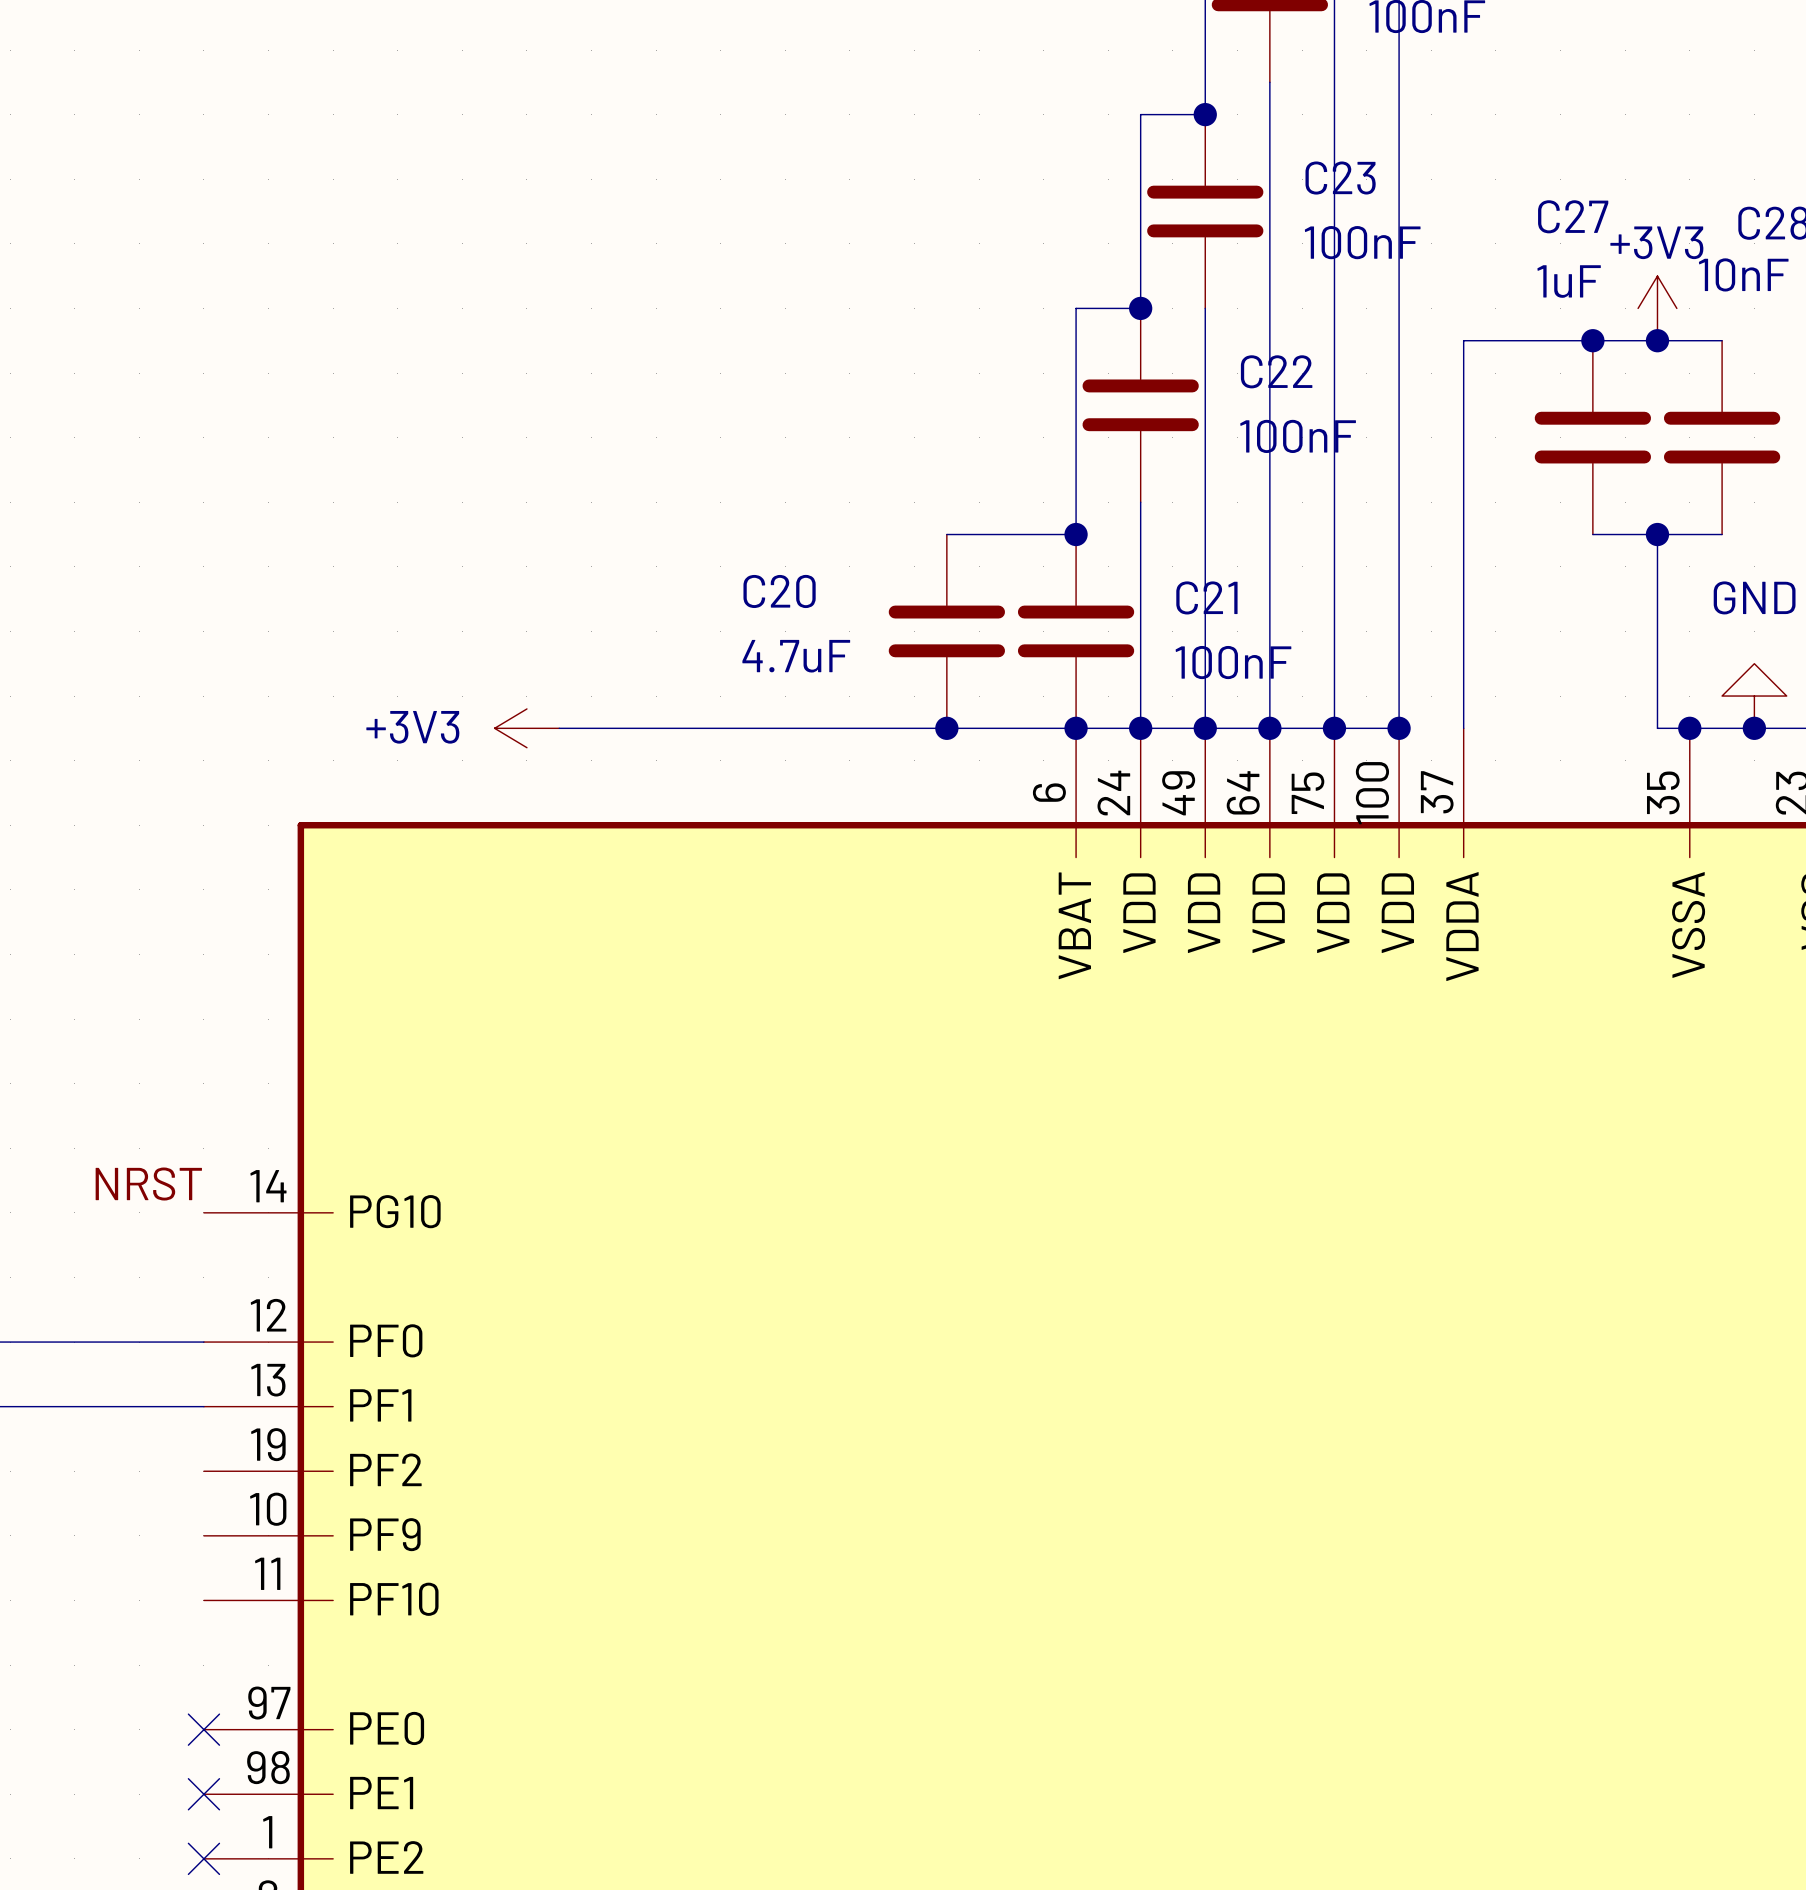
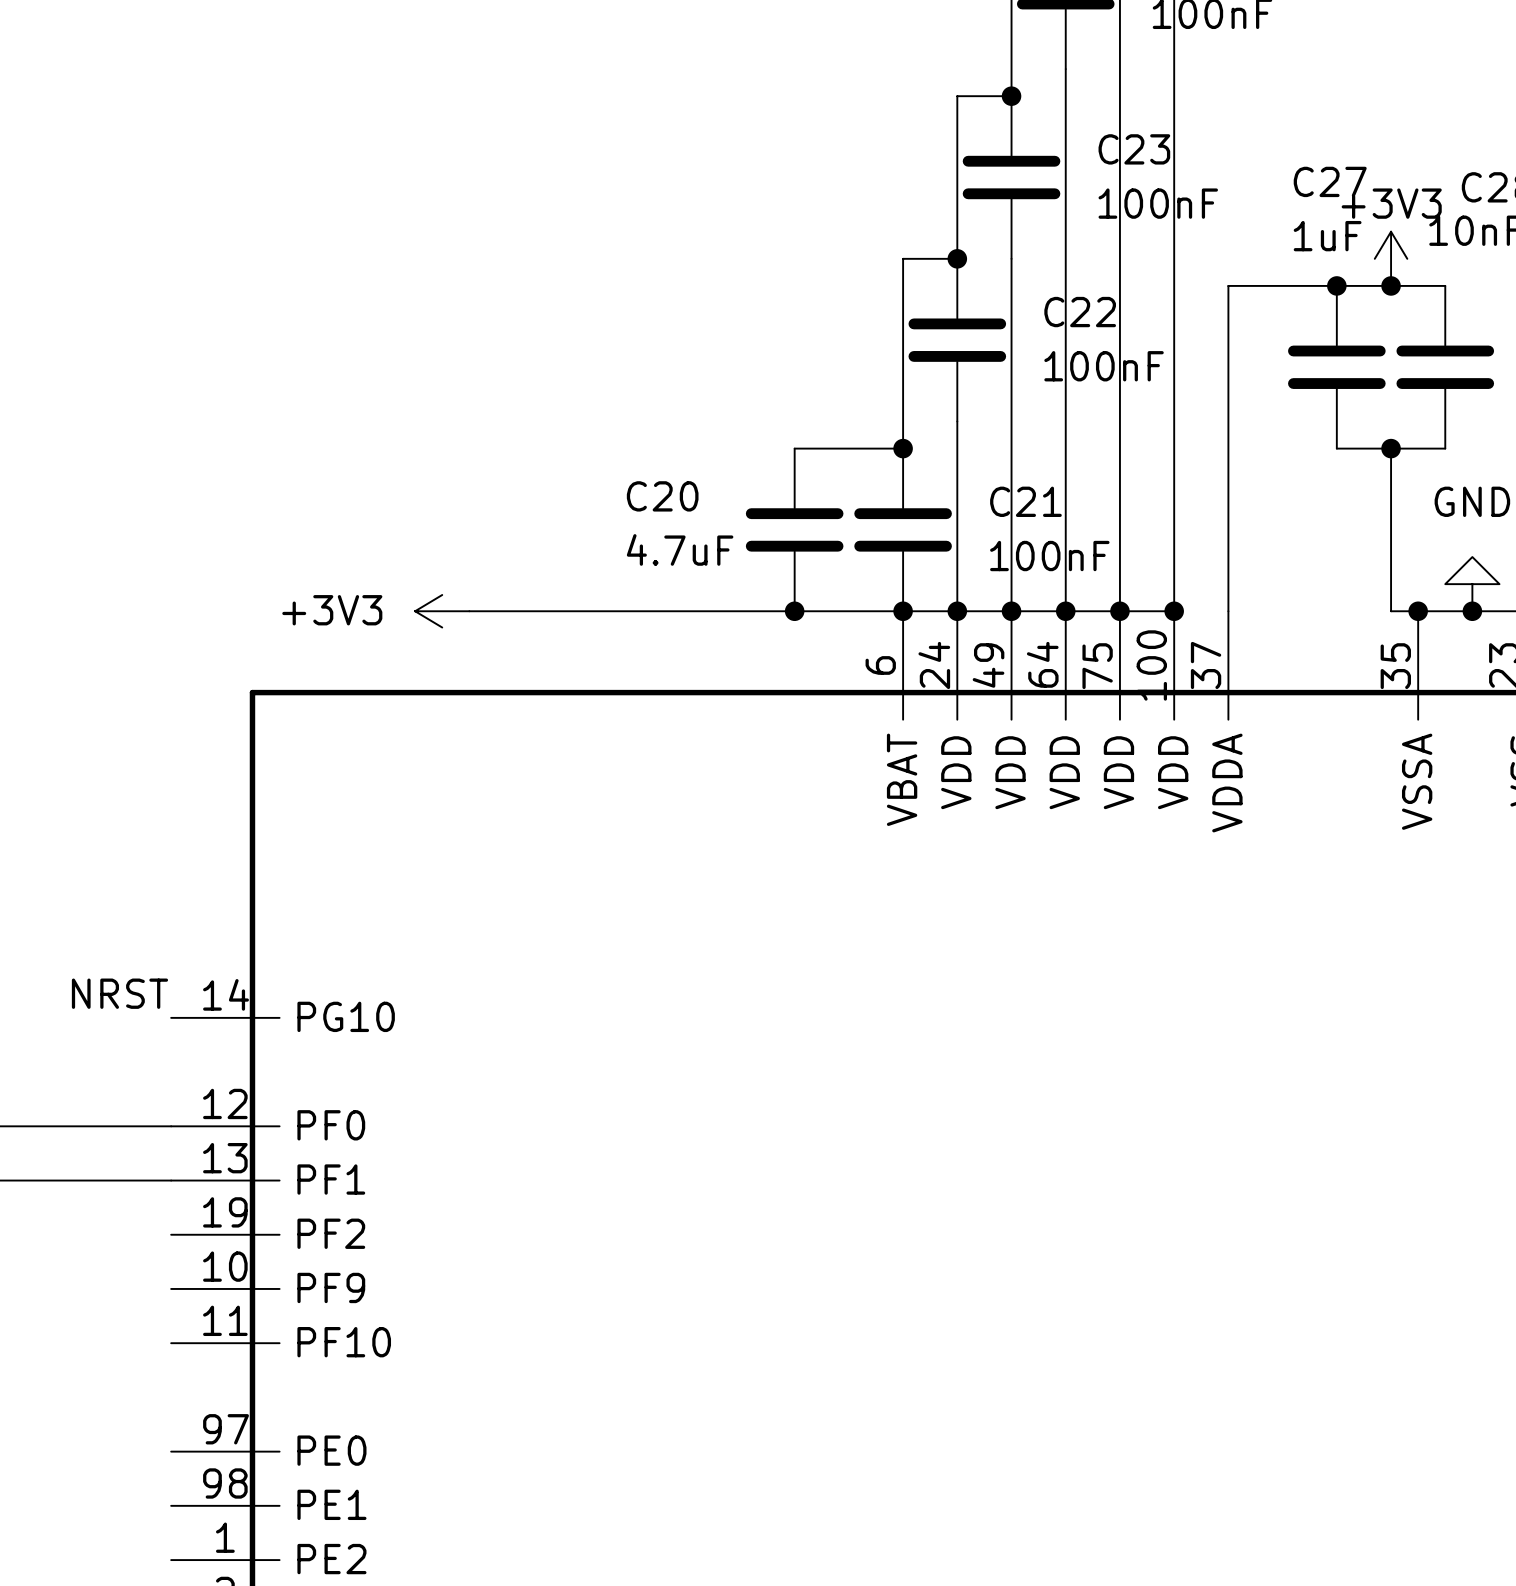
no-connect mark: (203, 1729) -> none
no-connect mark: (203, 1794) -> none
no-connect mark: (203, 1858) -> none

